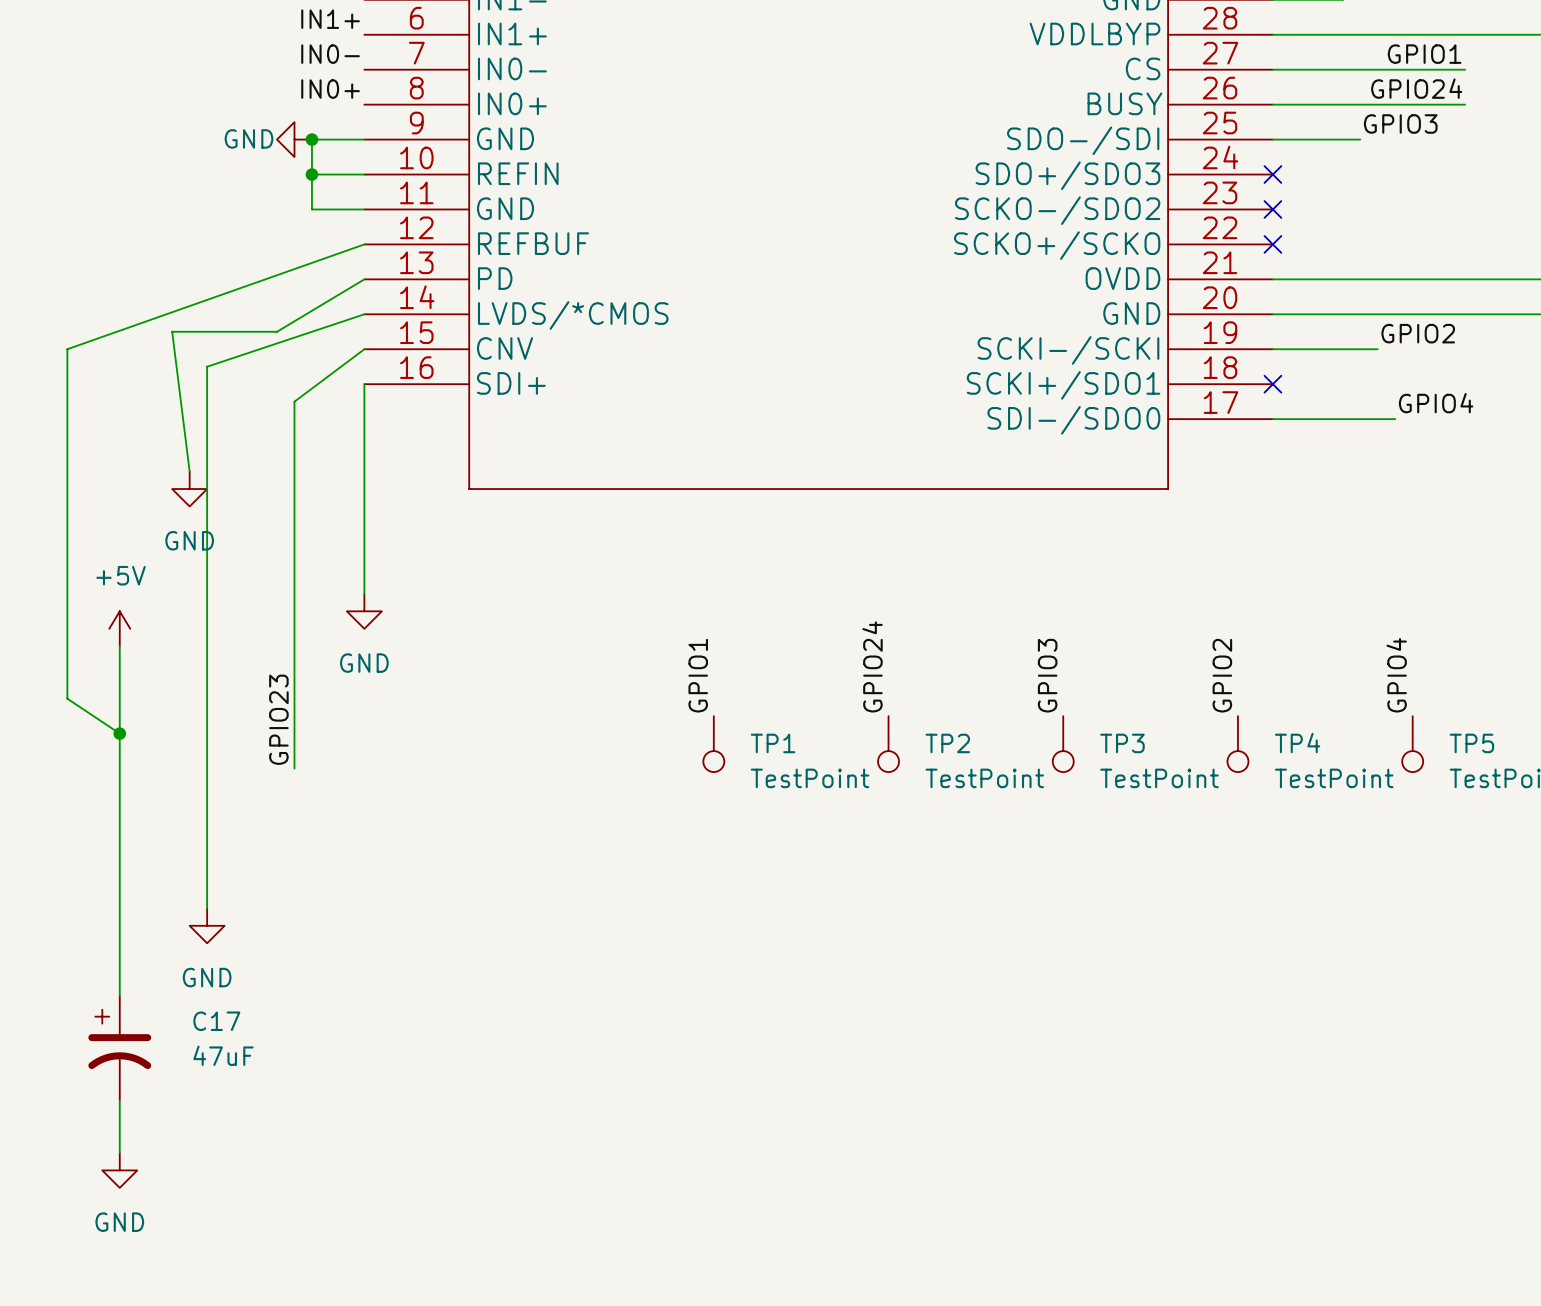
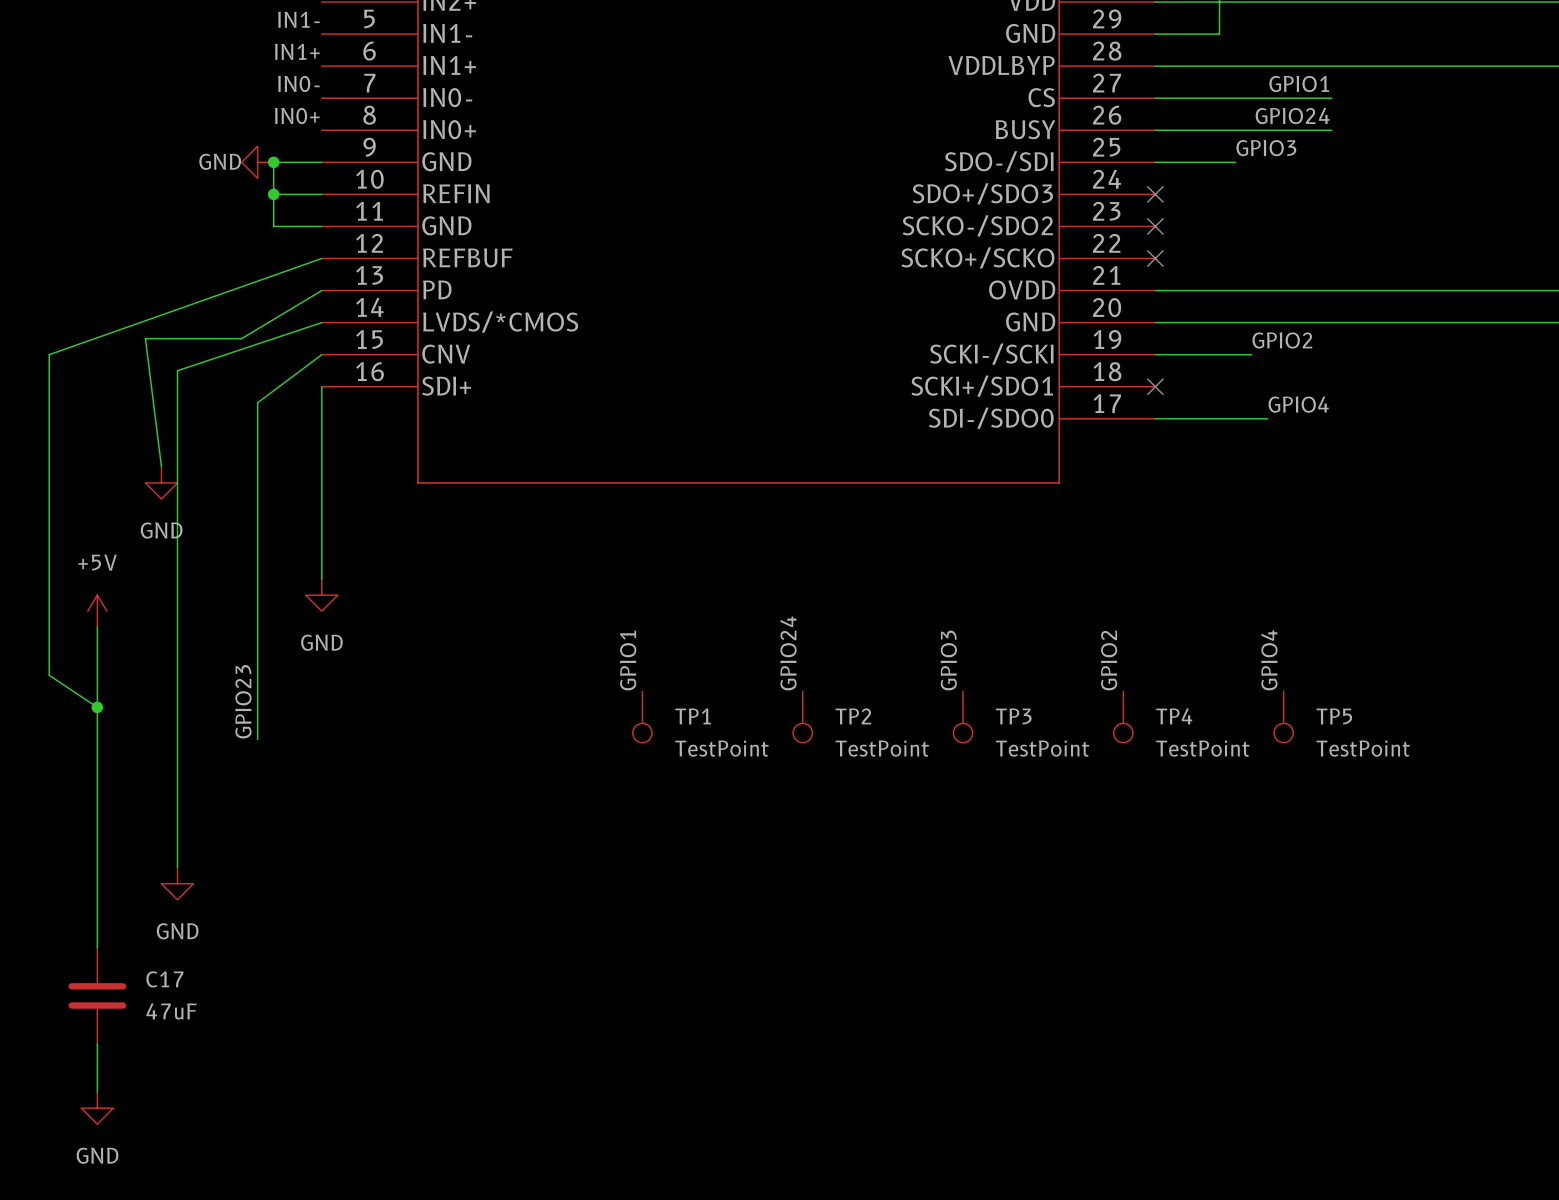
C17 symbol: [88, 995, 152, 1101] -> [68, 947, 127, 1045]

